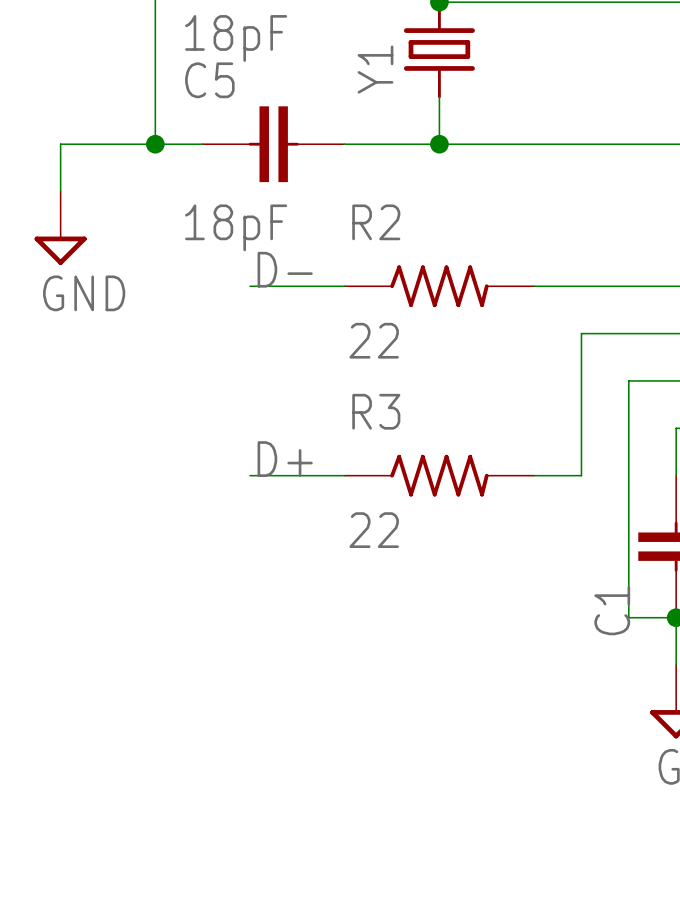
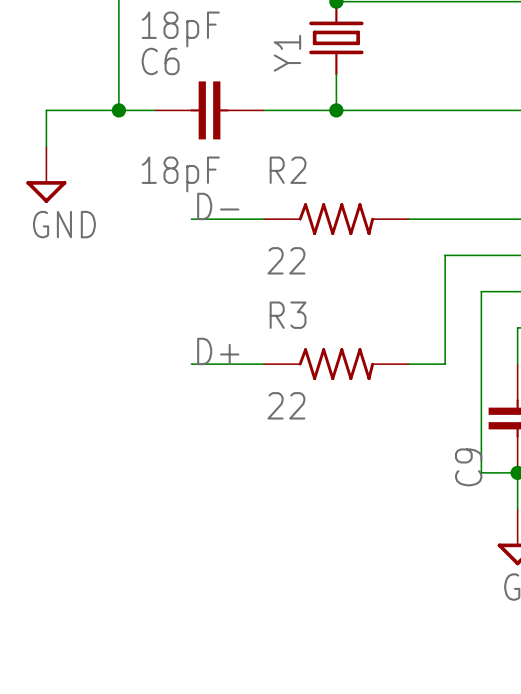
C5 name: C5 (209, 80) -> C6 (160, 61)
C1 name: C1 (612, 610) -> C9 (468, 467)

